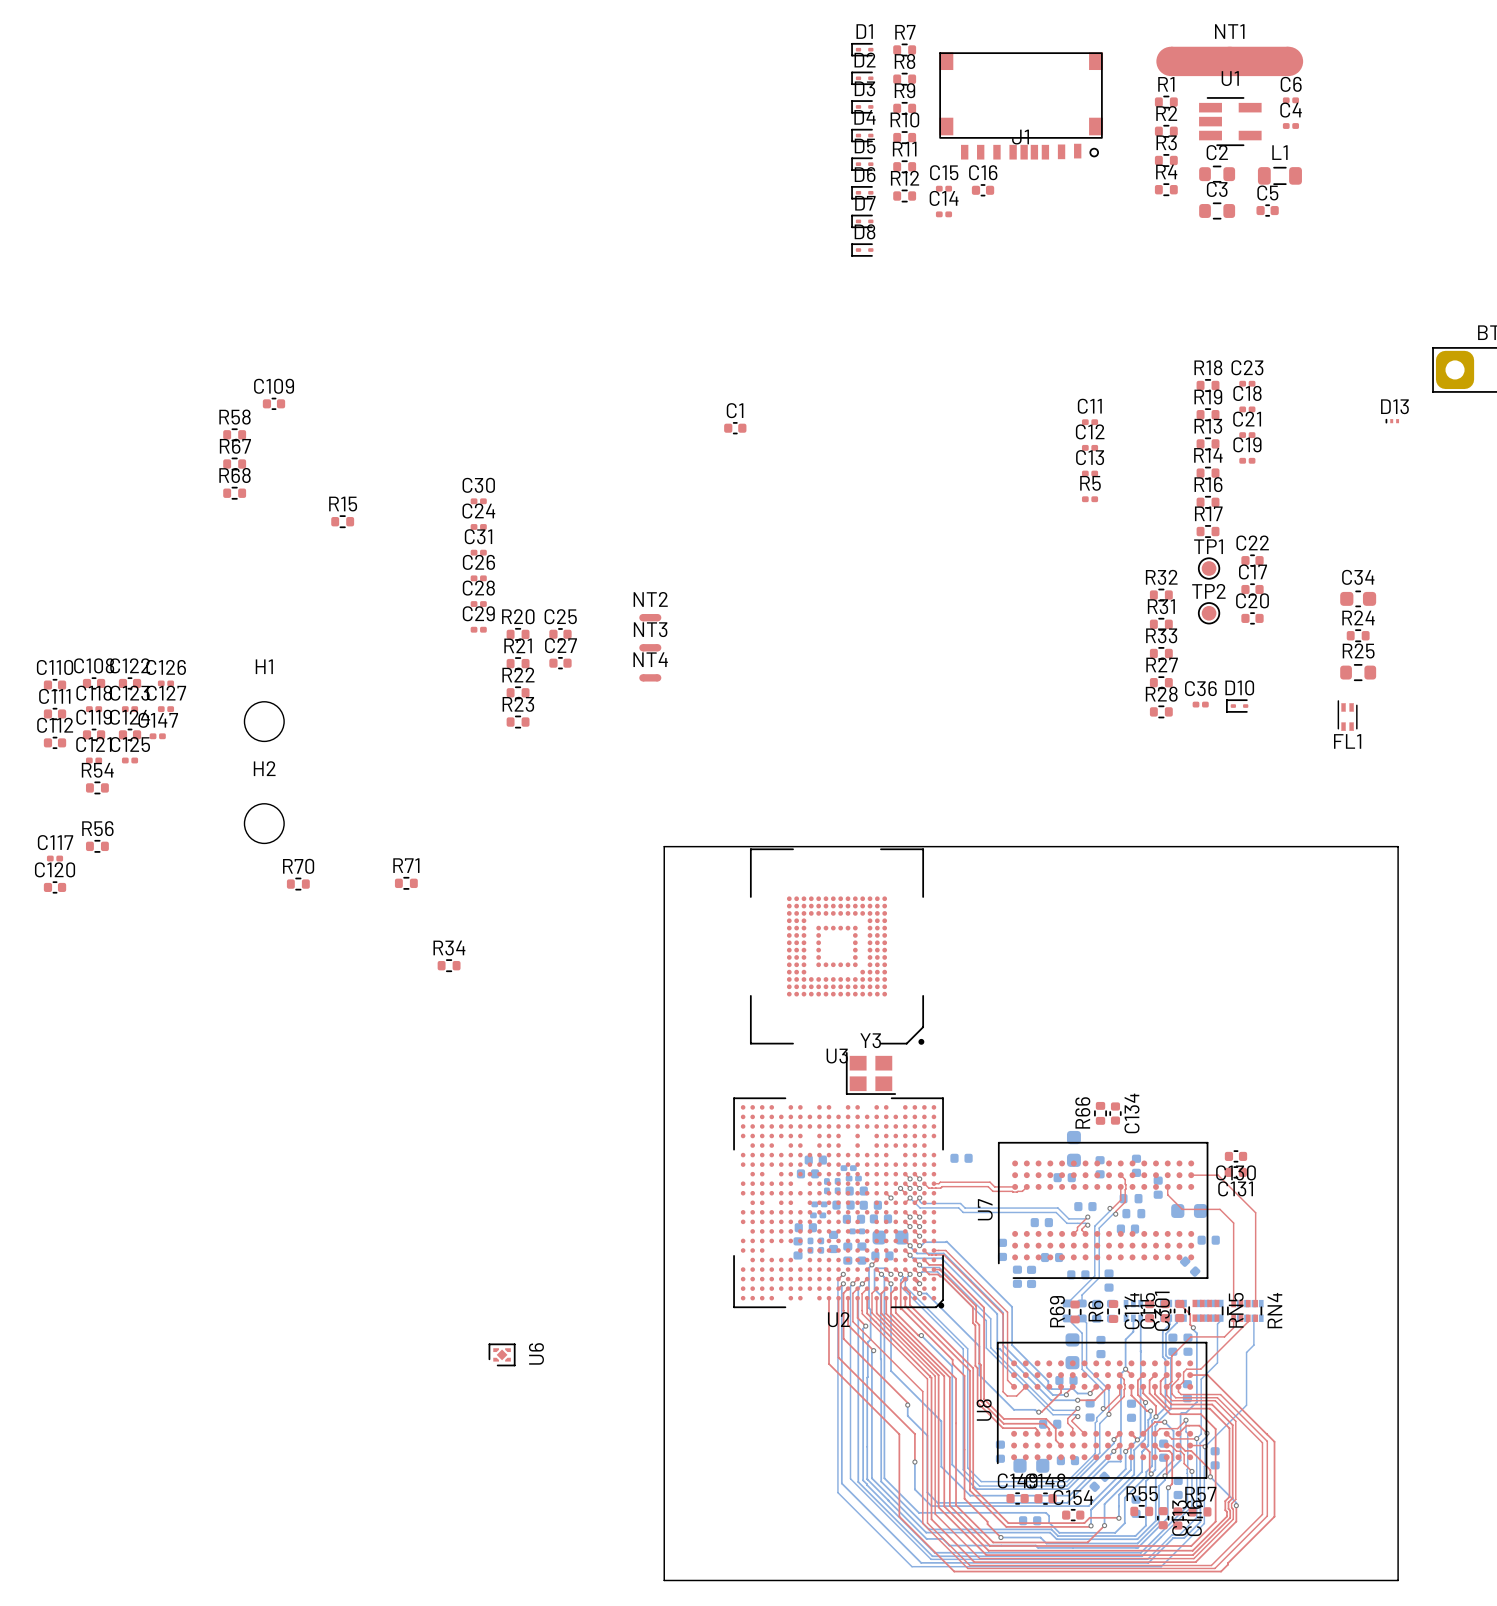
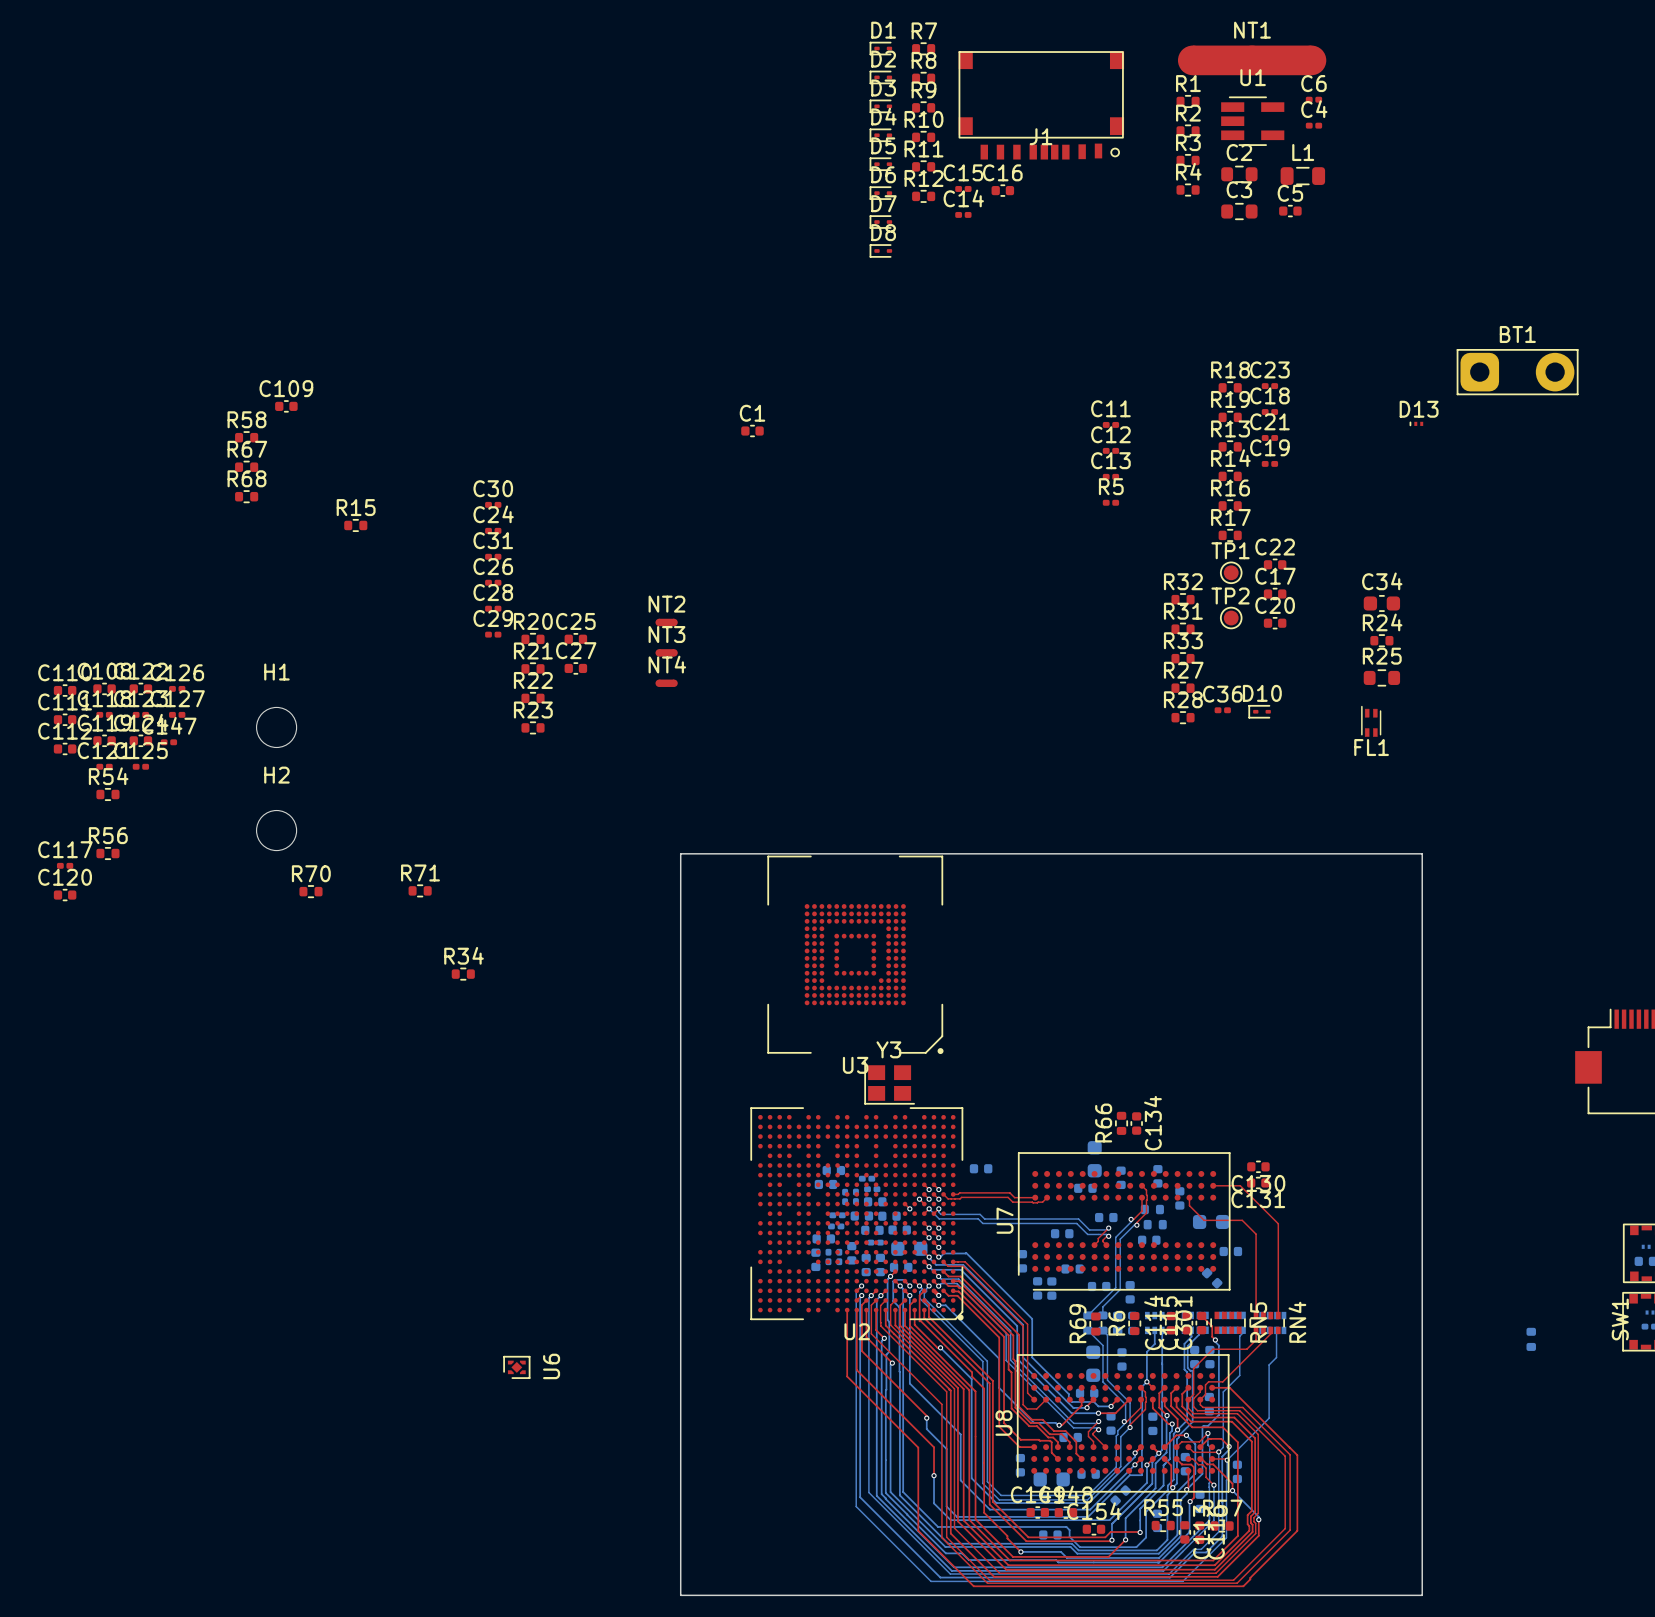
top track: none -> (943, 1290) (948, 1295) (957, 1295) (999, 1337) (999, 1426) (1019, 1447) (1034, 1447)
top track: none -> (953, 1290) (958, 1291) (1004, 1336) (1004, 1423) (1020, 1439) (1050, 1440) (1051, 1452) (1057, 1458)
top track: (976, 1306) (976, 1321) (979, 1324) (980, 1400) (1003, 1423) (1044, 1423) -> (995, 1318) (1013, 1335) (1015, 1407) (1030, 1422) (1038, 1422) (1049, 1434) (1061, 1434) (1064, 1436)
top track: (972, 1307) (972, 1323) (975, 1325) (975, 1365) (977, 1368) (977, 1402) (1002, 1428) (1035, 1428) (1037, 1430) -> (992, 1319) (1008, 1335) (1011, 1408) (1029, 1426) (1037, 1426) (1048, 1437) (1053, 1437) (1057, 1443)
top track: (984, 1307) (984, 1399) (1003, 1418) (1046, 1418) -> (1003, 1319) (1019, 1334) (1019, 1406) (1032, 1419) (1042, 1419) (1053, 1431) (1066, 1432)

